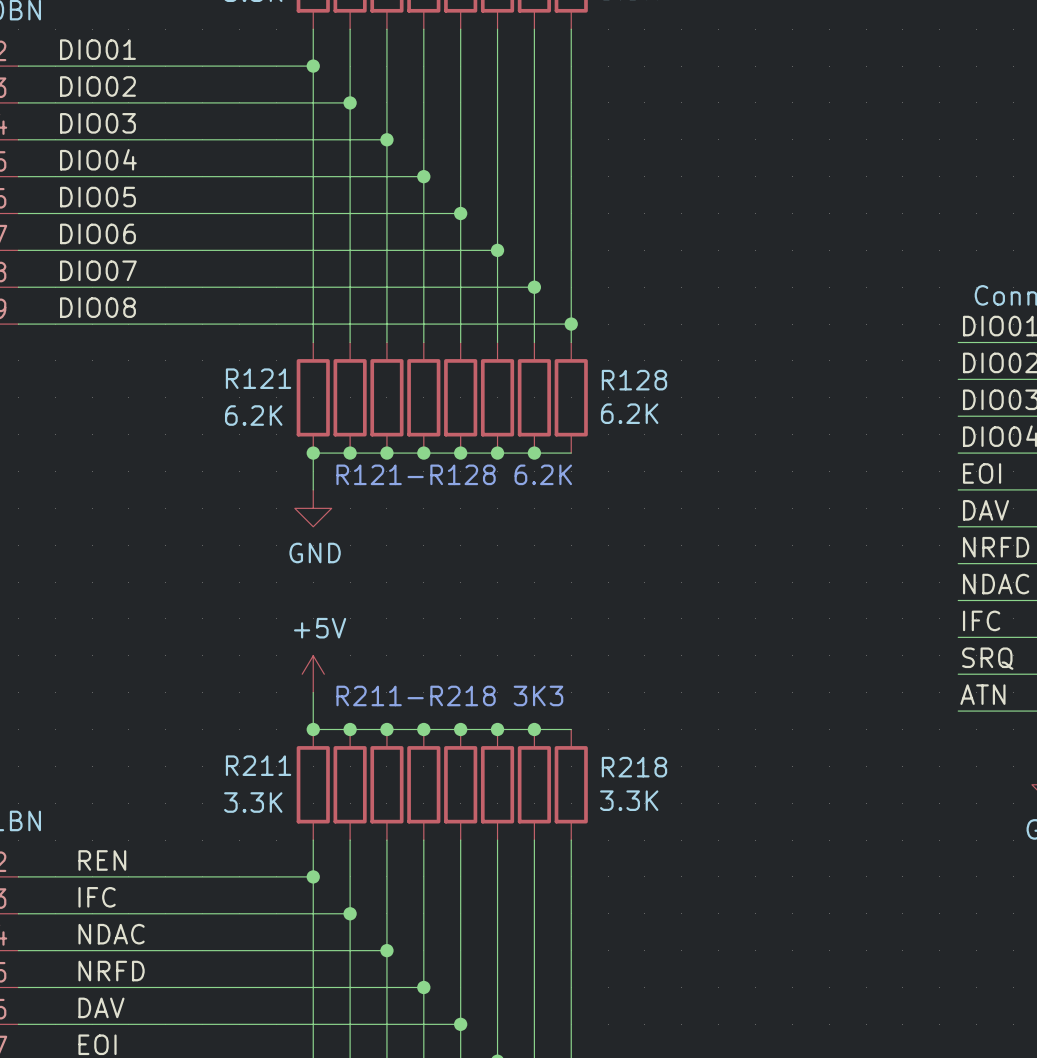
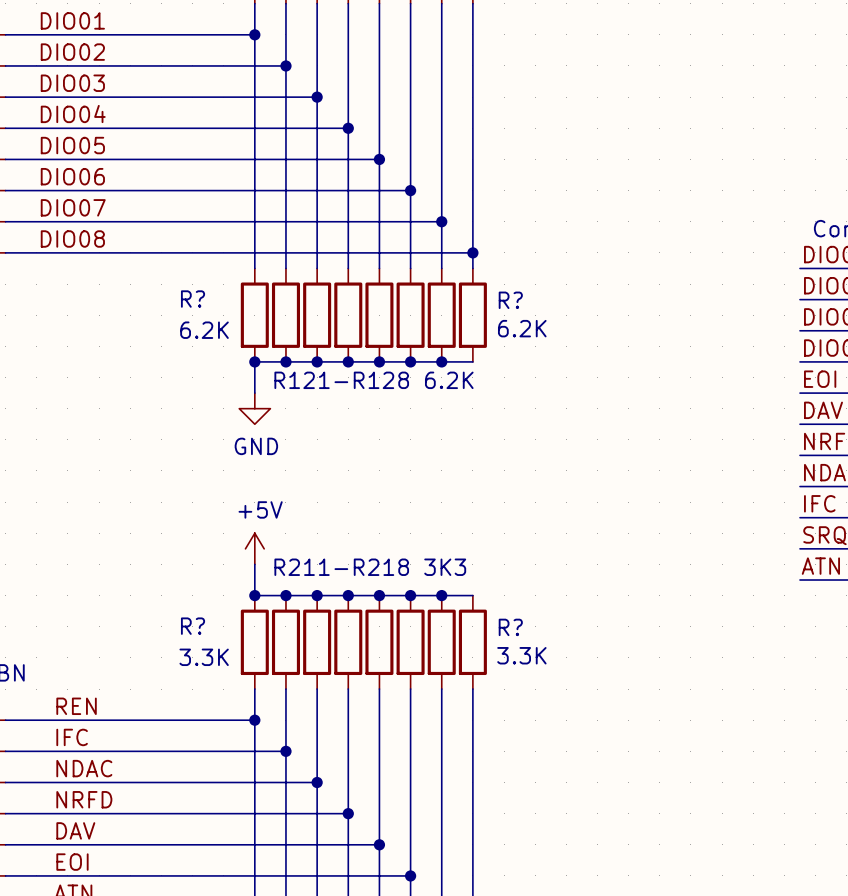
R121 name: R121 (258, 378) -> R? (193, 299)
R128 name: R128 (634, 380) -> R? (510, 300)
R211 name: R211 (258, 765) -> R? (193, 626)
R218 name: R218 (634, 767) -> R? (510, 627)

